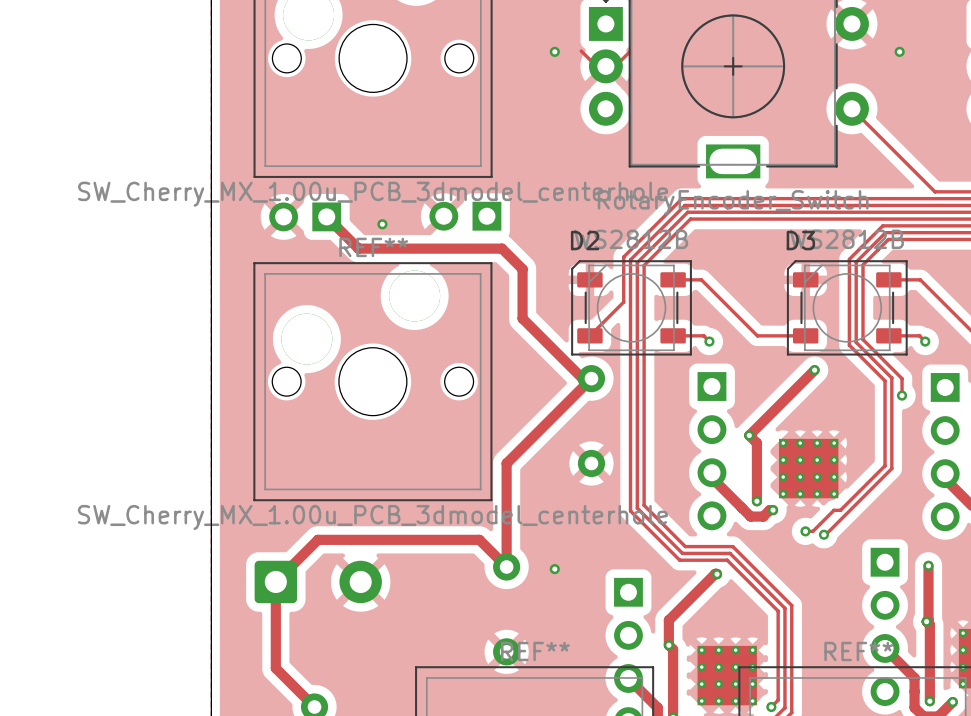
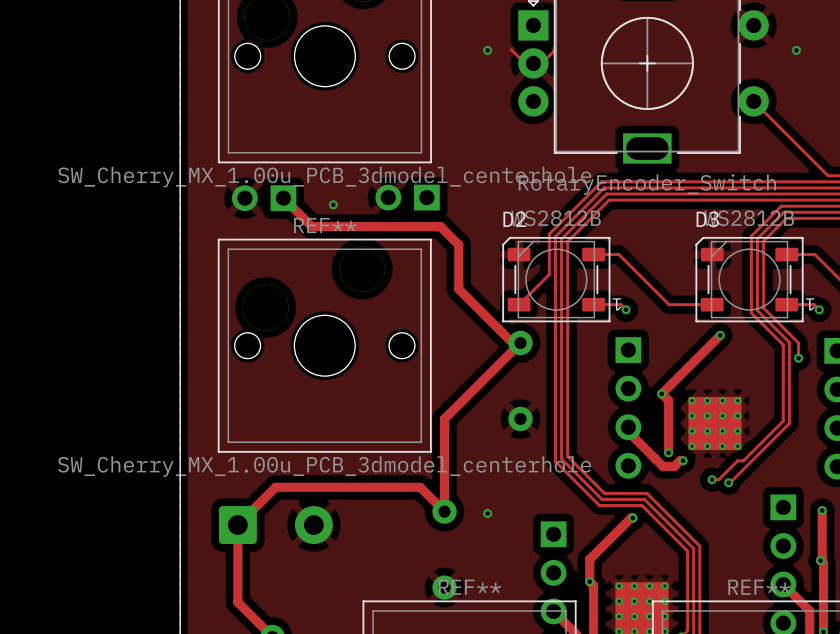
D2 text: none -> 1 (617, 304)
D3 text: none -> 1 (810, 304)

